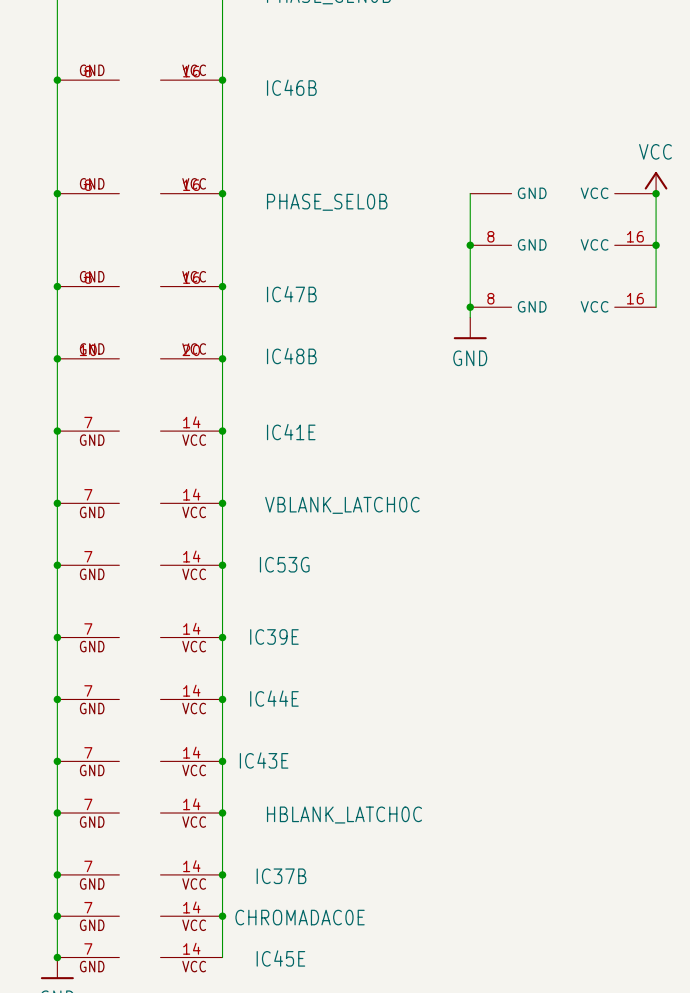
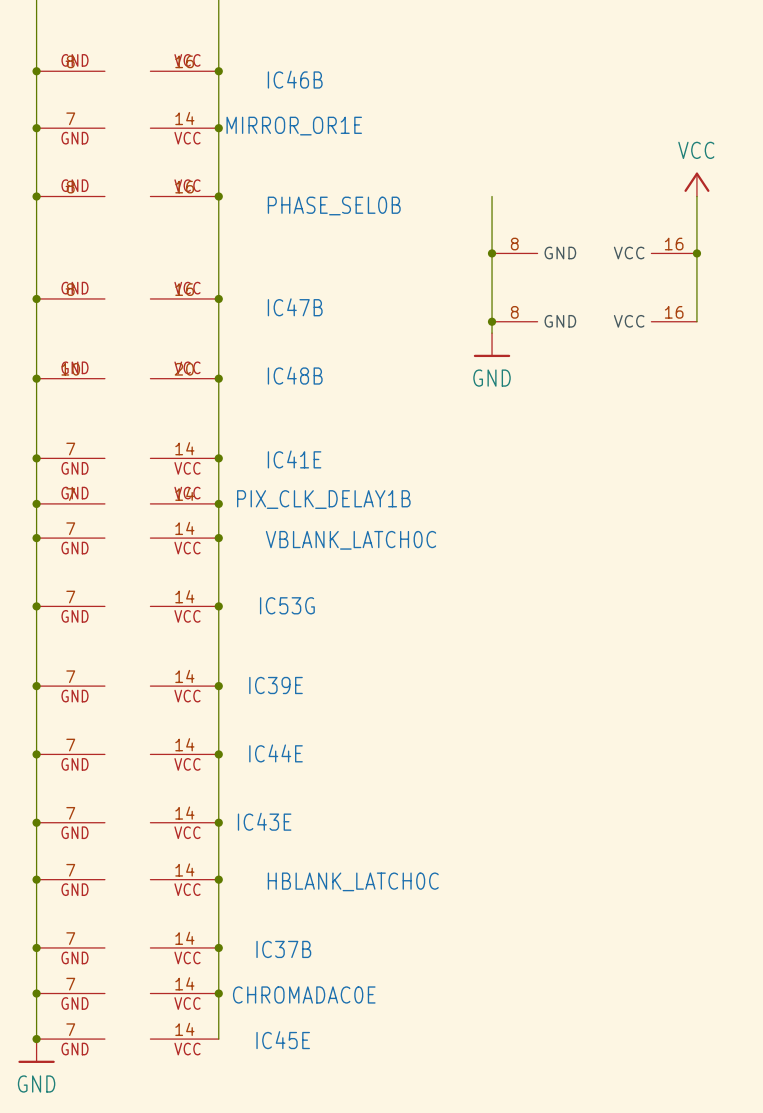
junction: none -> (36, 128)
MIRROR_OR1E: none -> (127, 128)
junction: none -> (218, 128)
part: (563, 193) -> none
junction: (656, 193) -> none
junction: none -> (36, 503)
PIX_CLK_DELAY1B: none -> (127, 503)
junction: none -> (218, 503)

